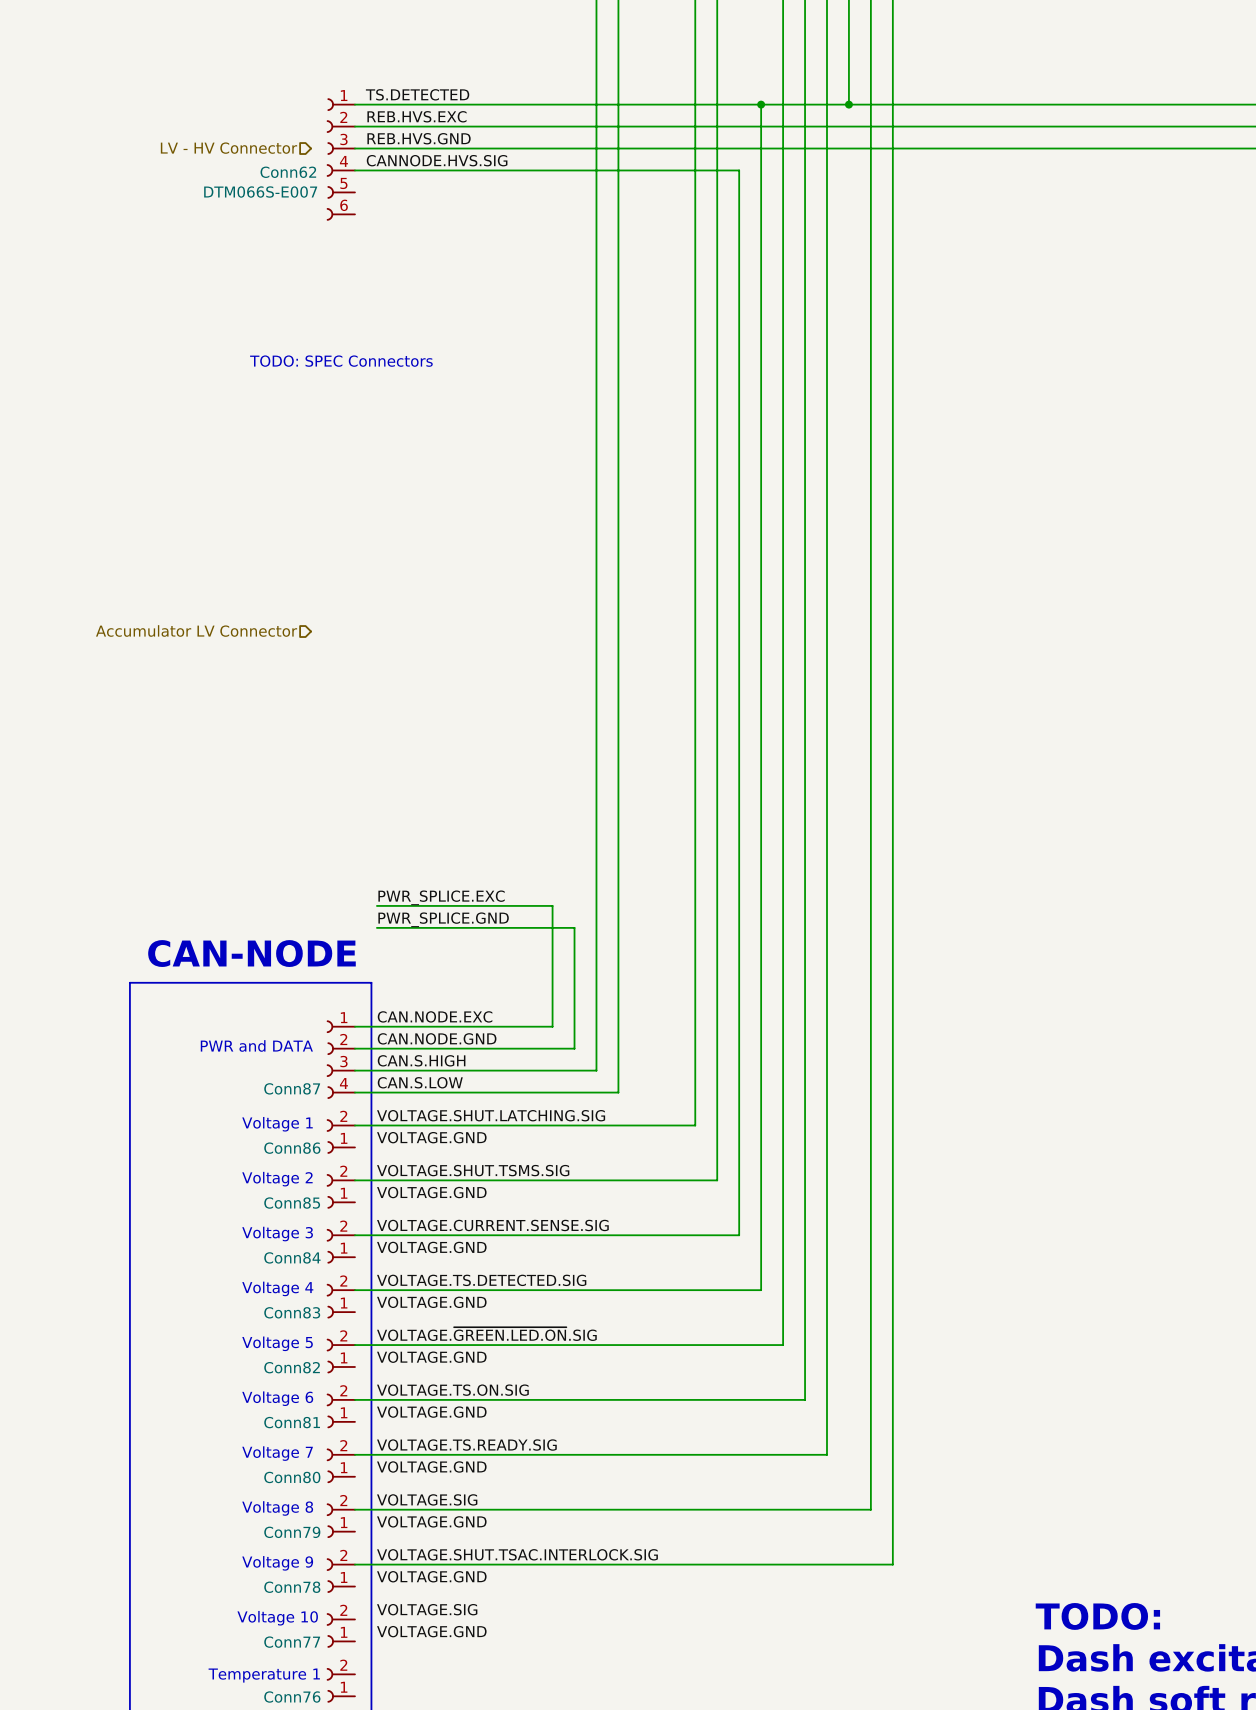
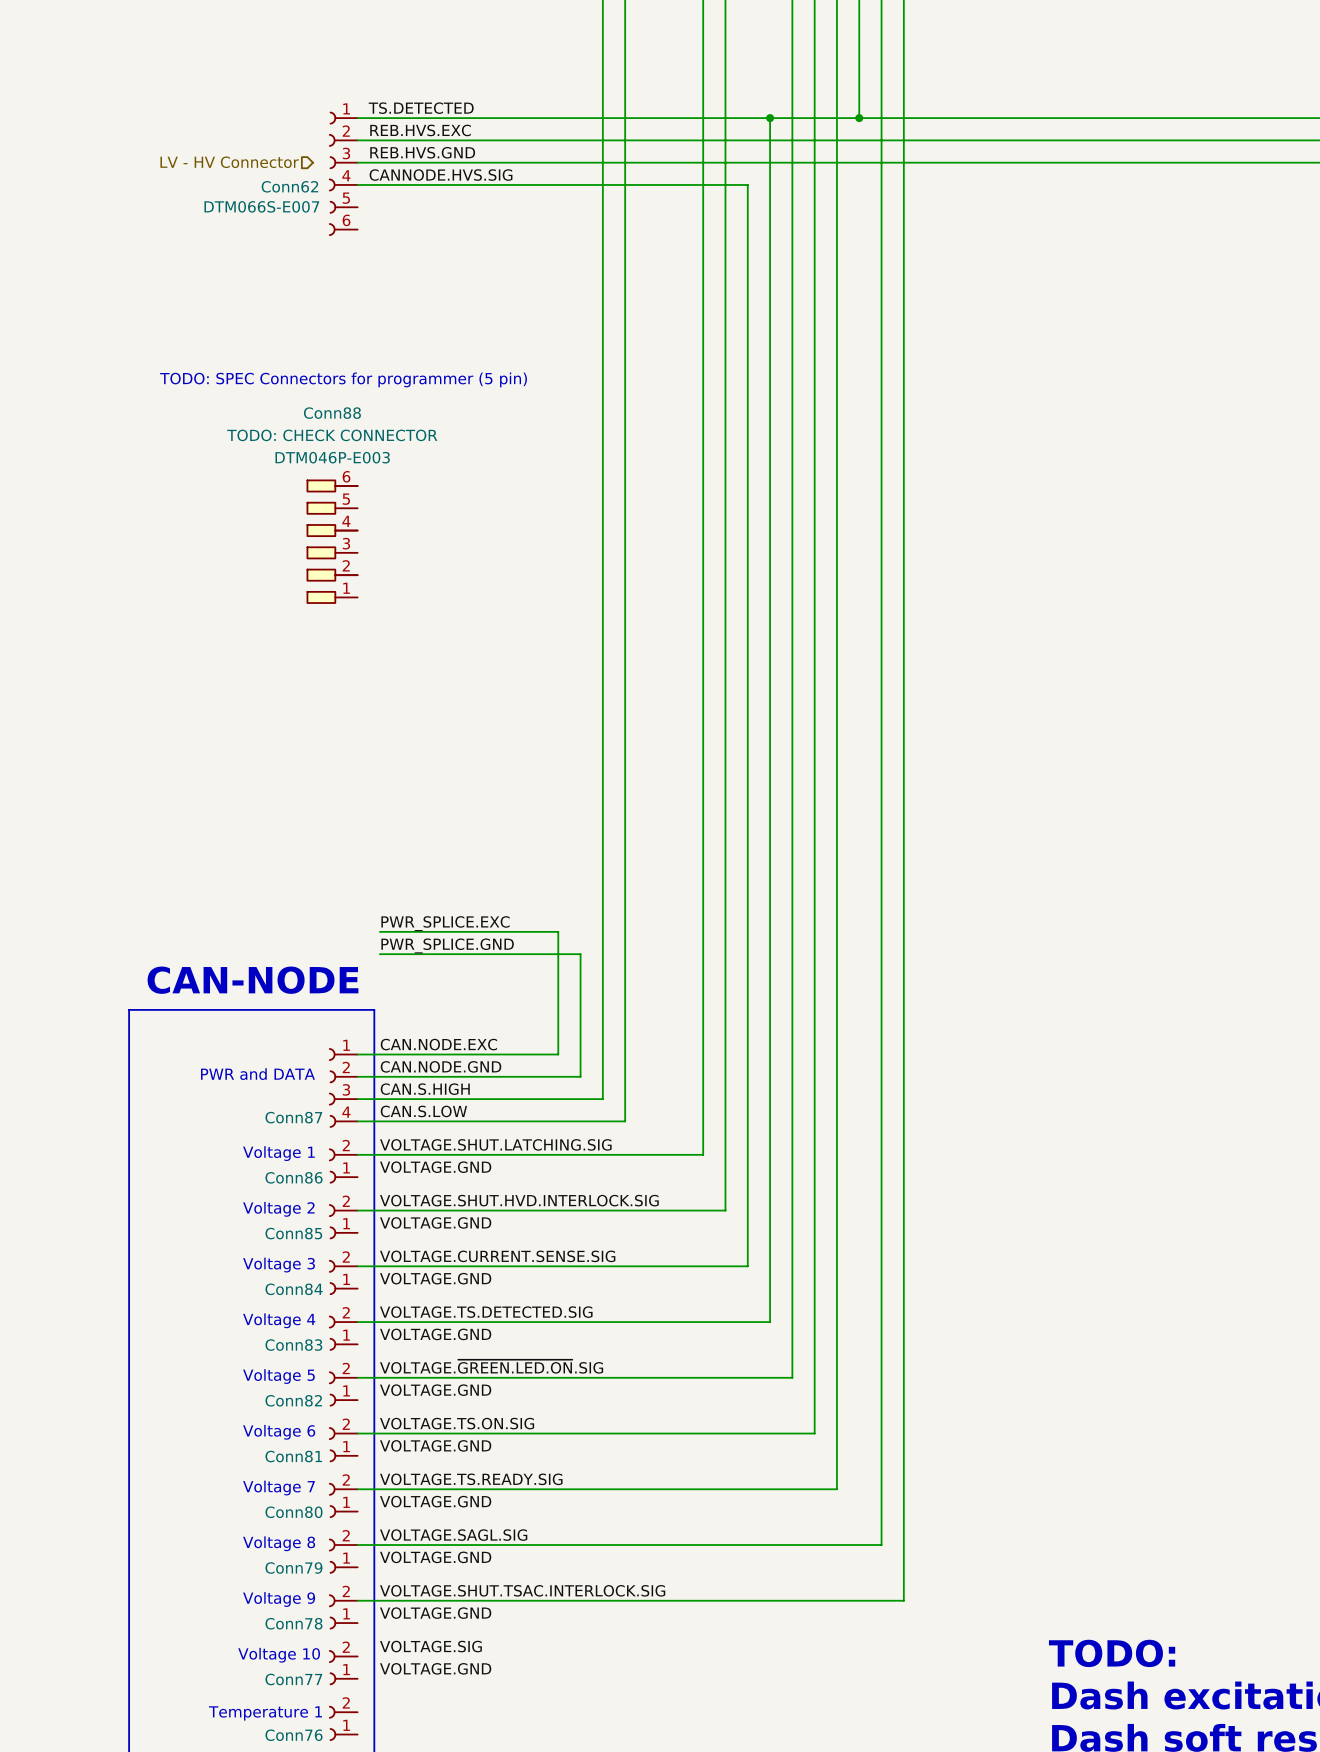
text: TODO: SPEC Connectors (341, 361) -> TODO: SPEC Connectors for programmer (5 pin) (343, 379)
Conn88: none -> TODO: CHECK CONNECTOR (332, 541)
hierarchical label: Accumulator LV Connector (196, 630) -> none
label: VOLTAGE.SHUT.TSMS.SIG (473, 1170) -> VOLTAGE.SHUT.HVD.INTERLOCK.SIG (519, 1200)
label: VOLTAGE.SIG (427, 1499) -> VOLTAGE.SAGL.SIG (453, 1535)

